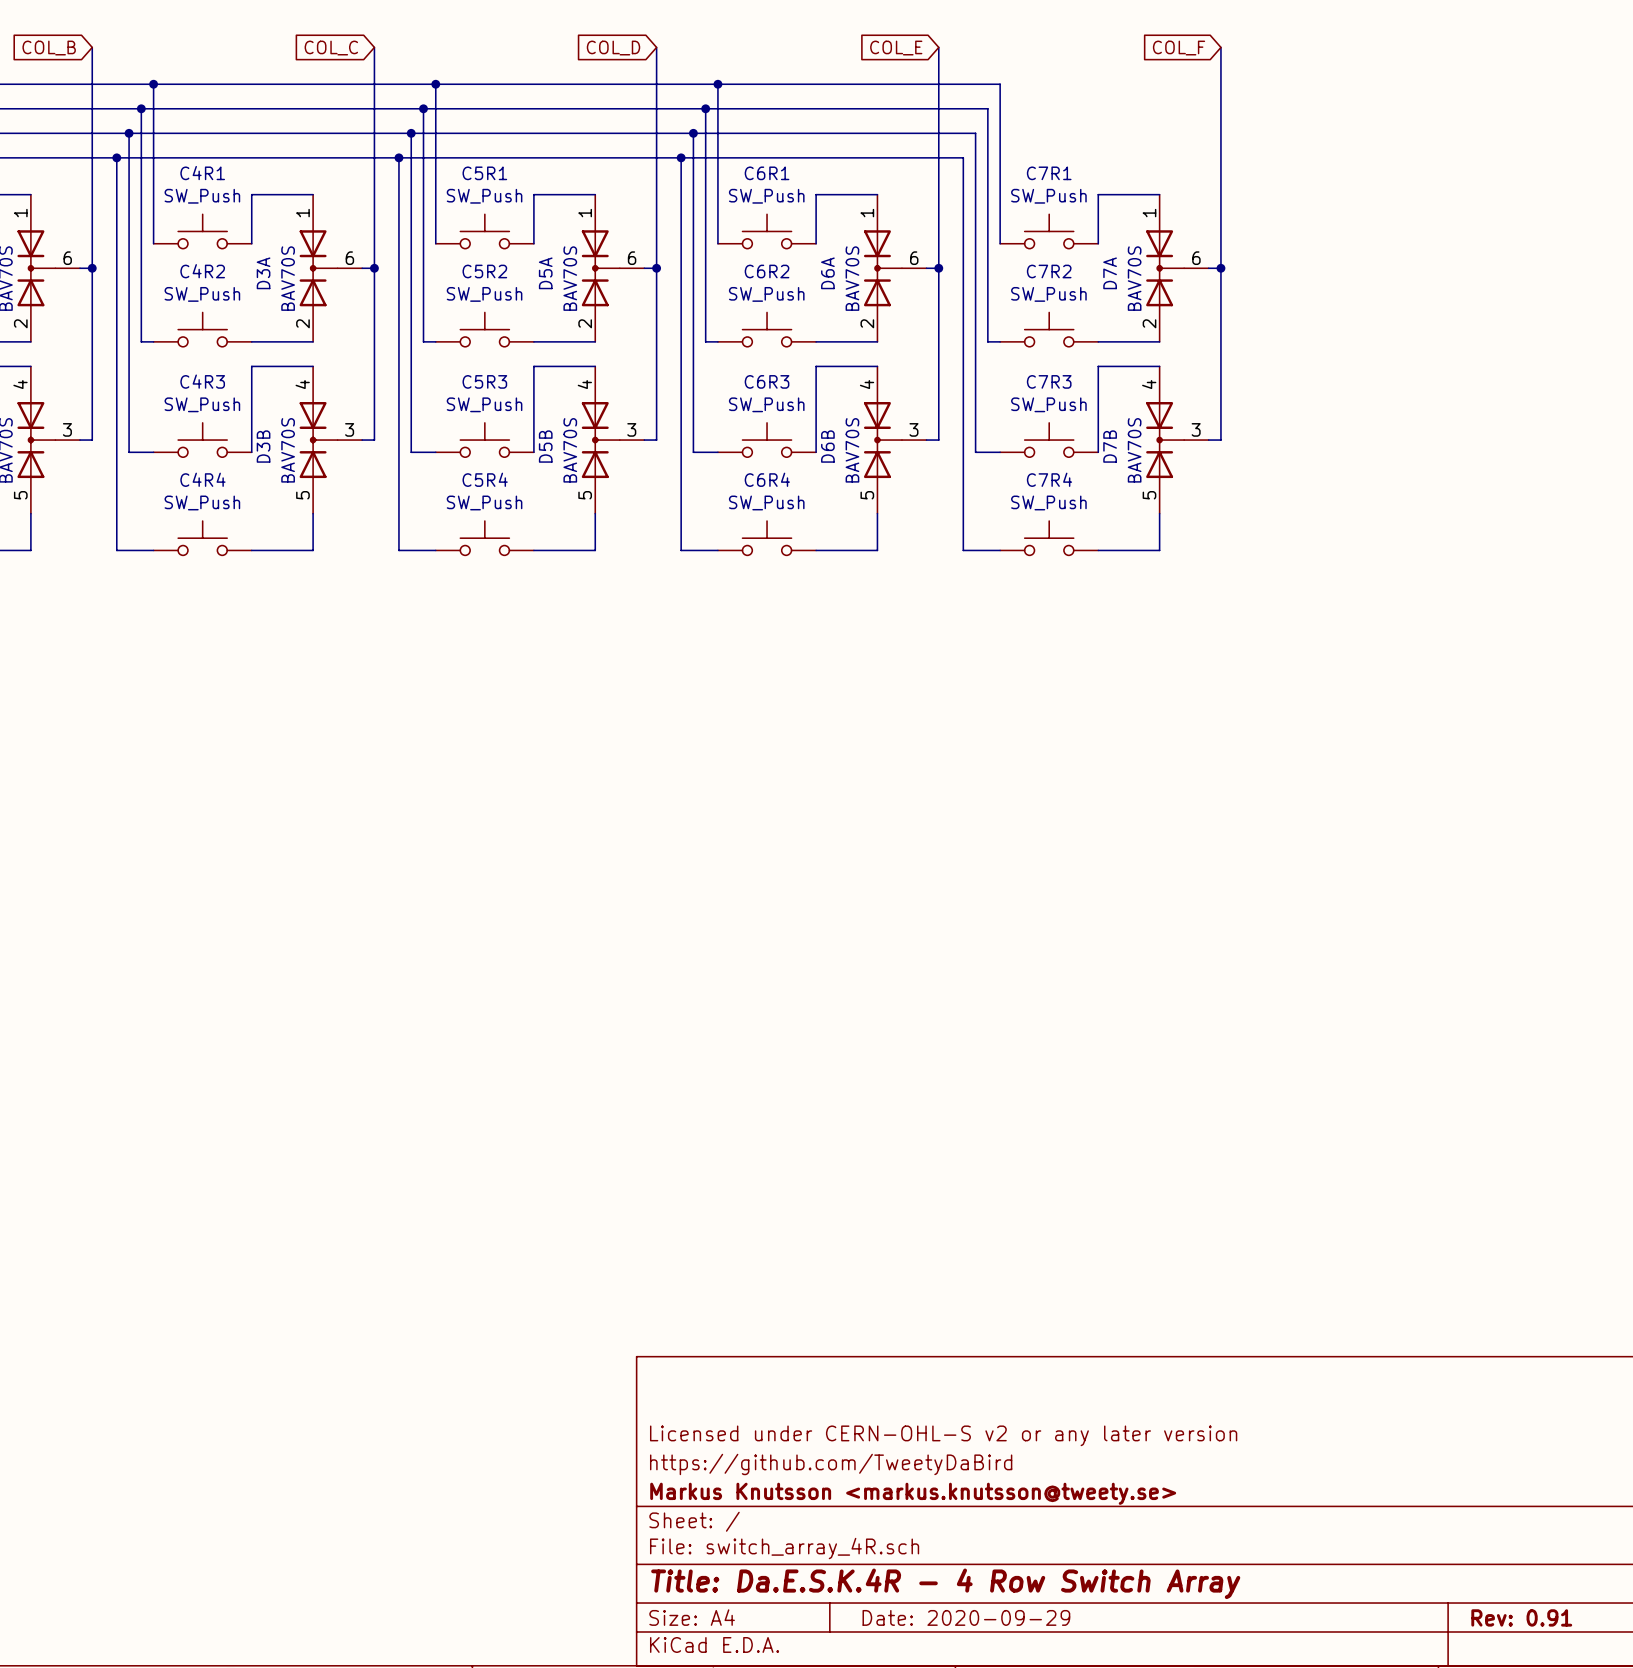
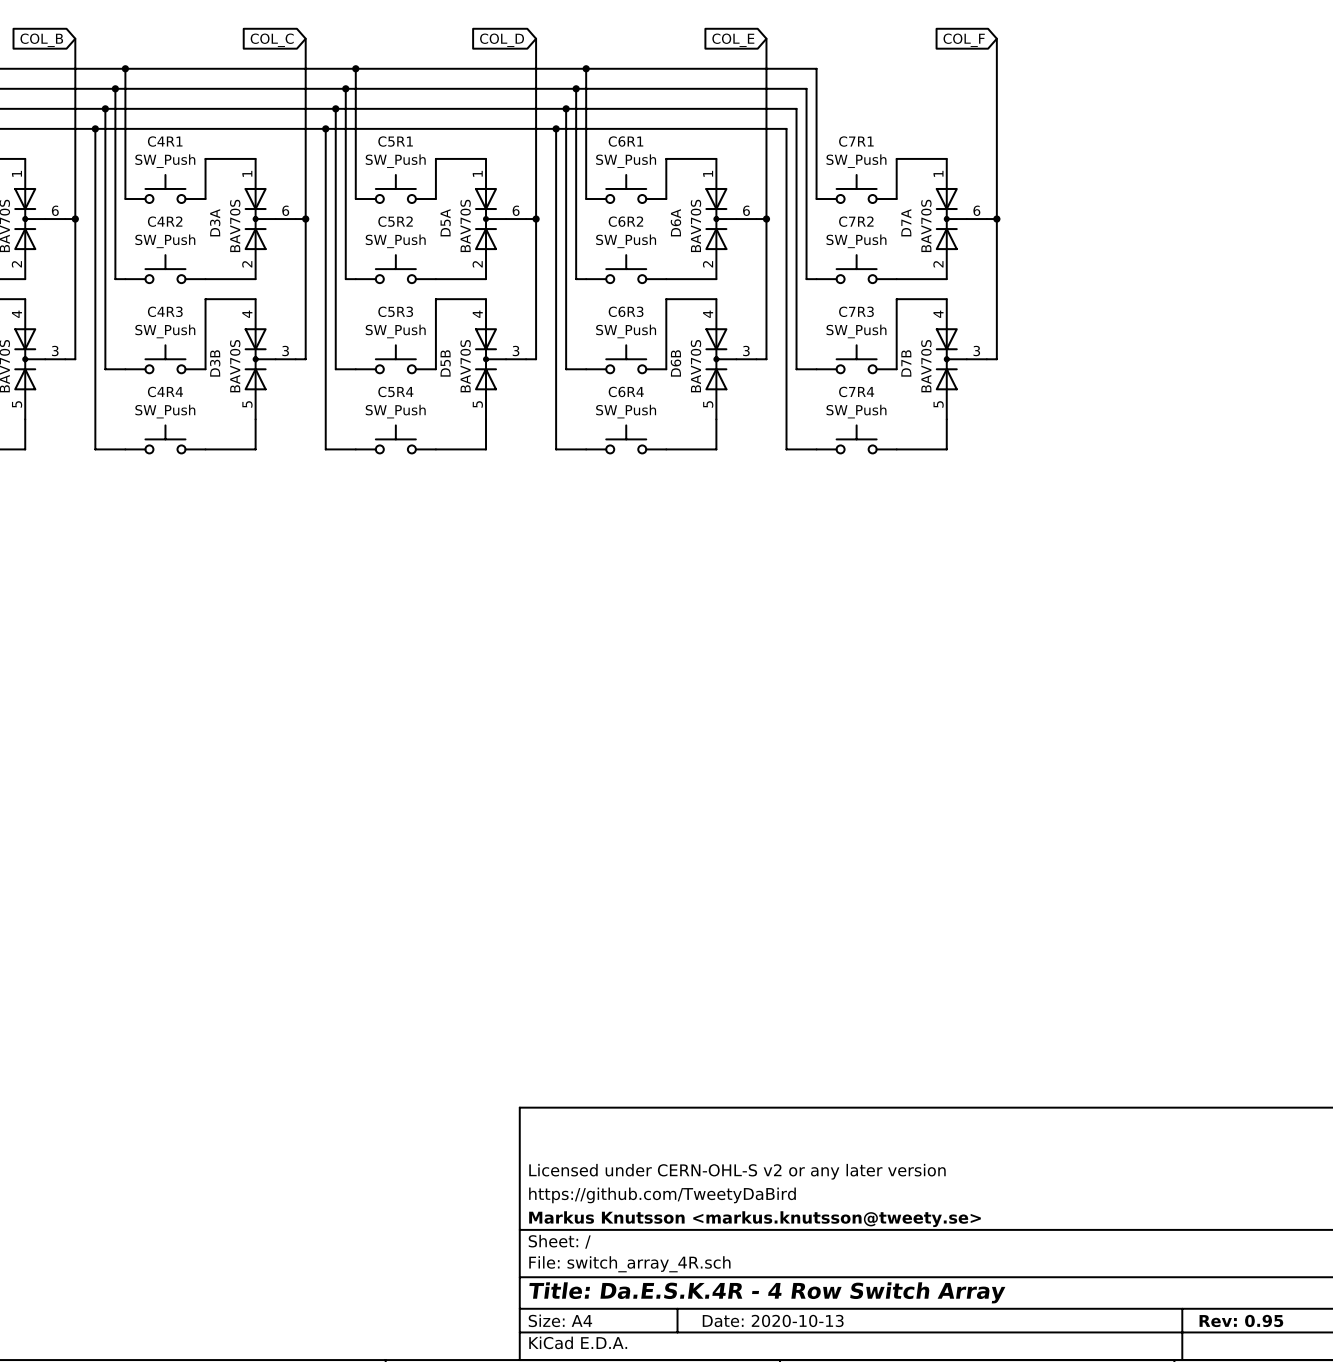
title block: Date: 2020-09-29 (966, 1617) -> Date: 2020-10-13 (773, 1320)
title block: Rev: 0.91 (1521, 1617) -> Rev: 0.95 (1241, 1320)

